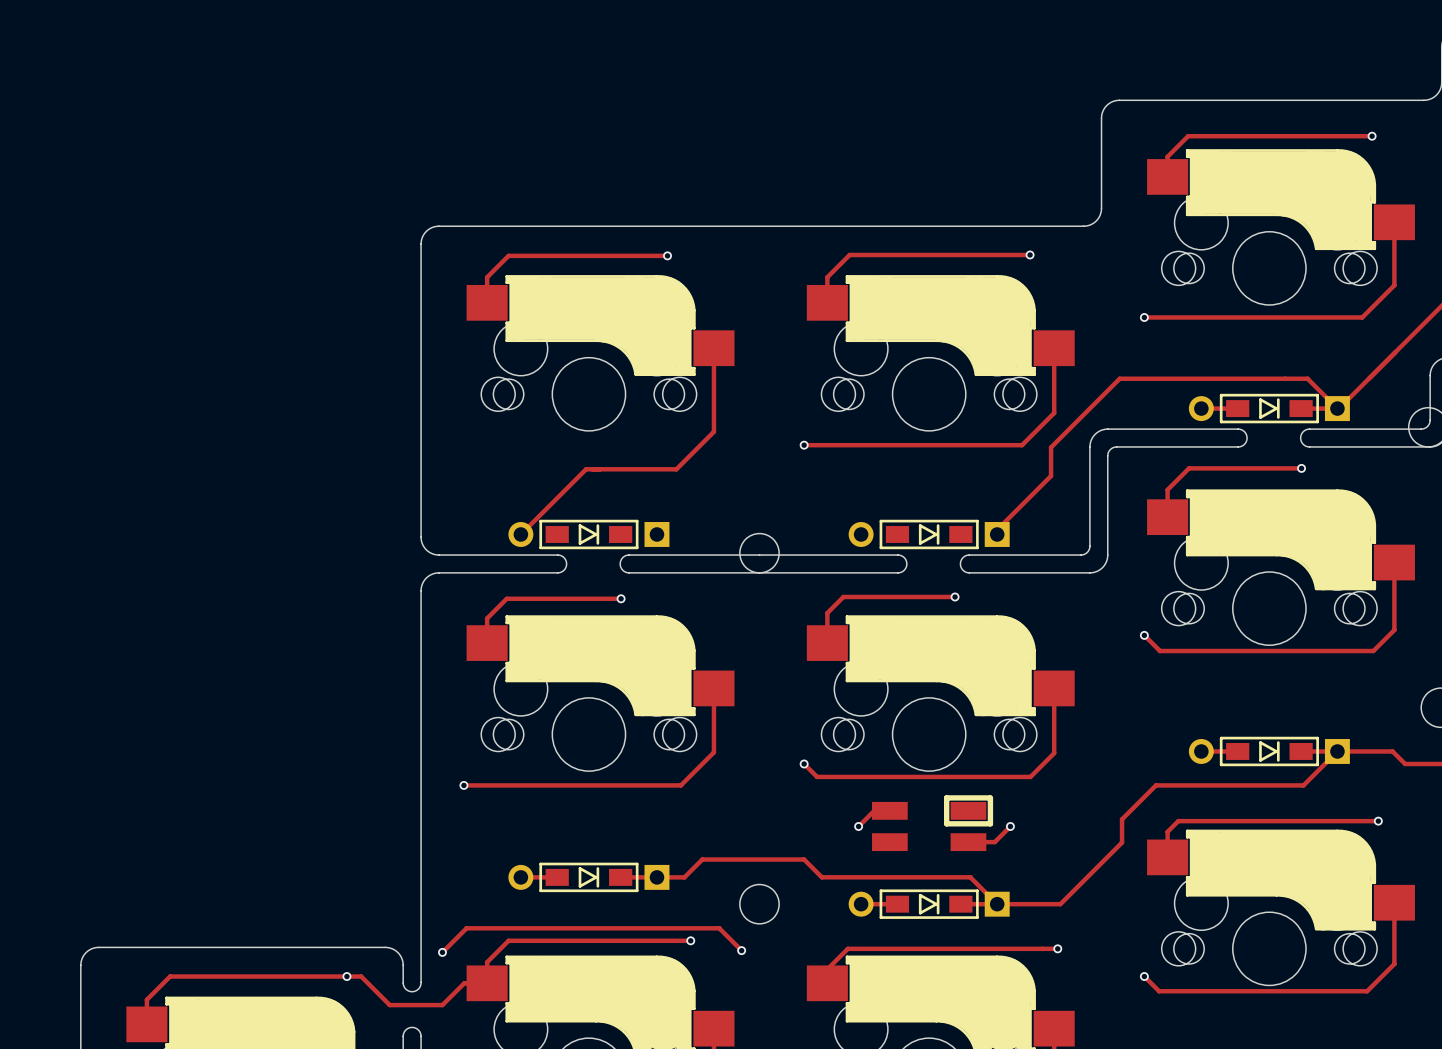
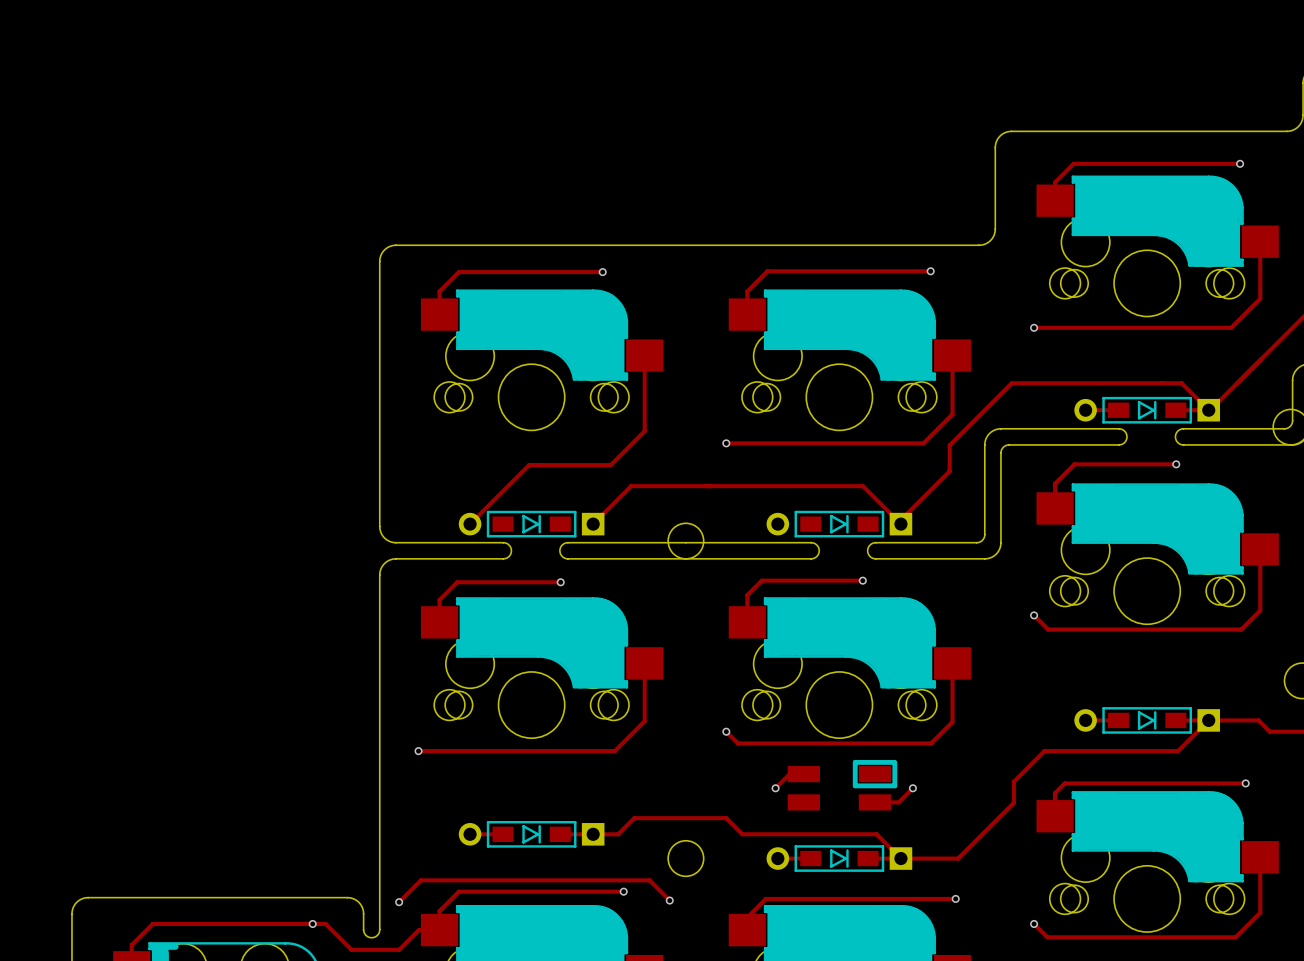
track: none -> (593, 524) (631, 486) (862, 486) (900, 524)

